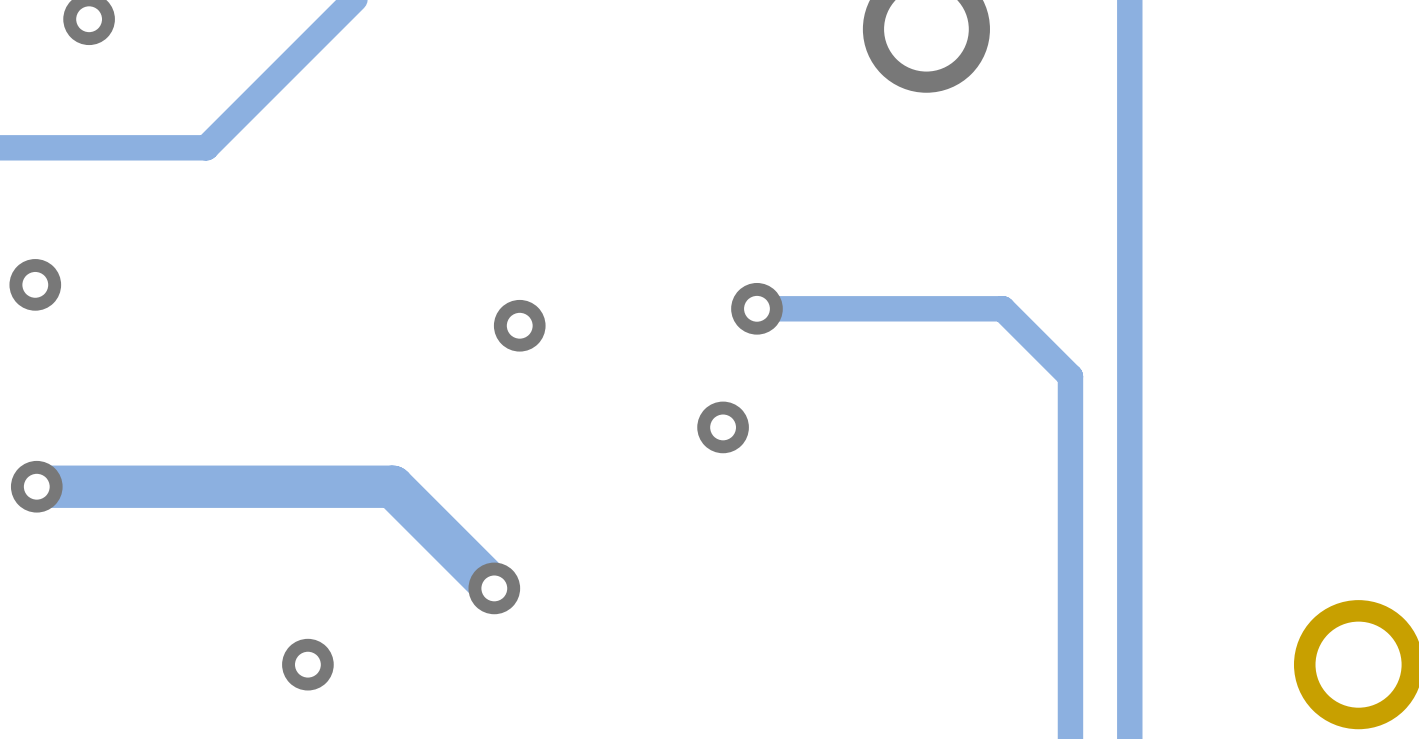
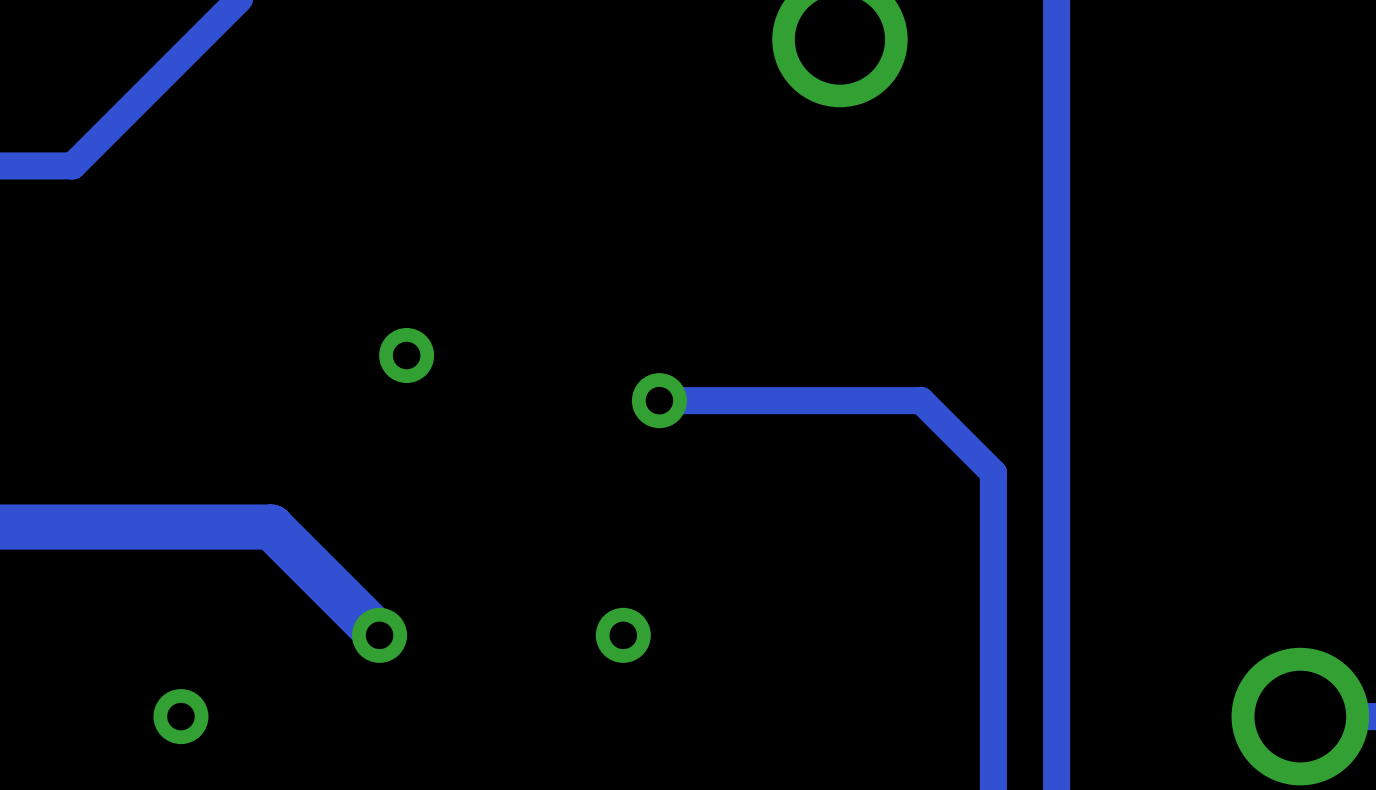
track: (756, 308) (1002, 308) (1070, 376) (1070, 435) -> (659, 400) (921, 400) (993, 472)
via: (756, 308) -> none
via: none -> (659, 400)
via: (723, 427) -> none
via: none -> (623, 635)

